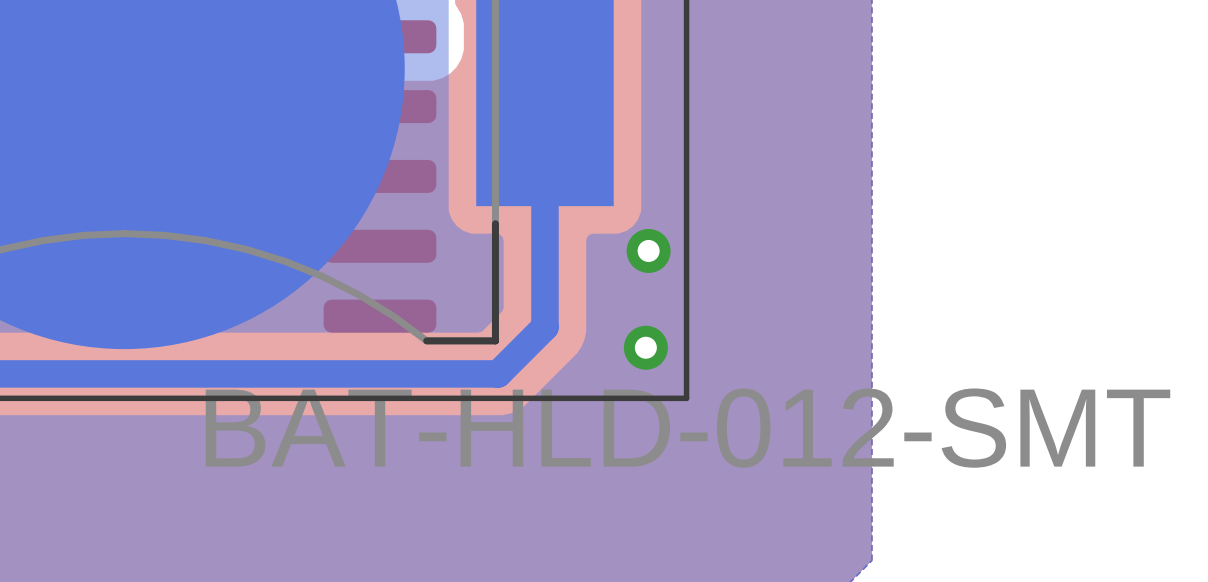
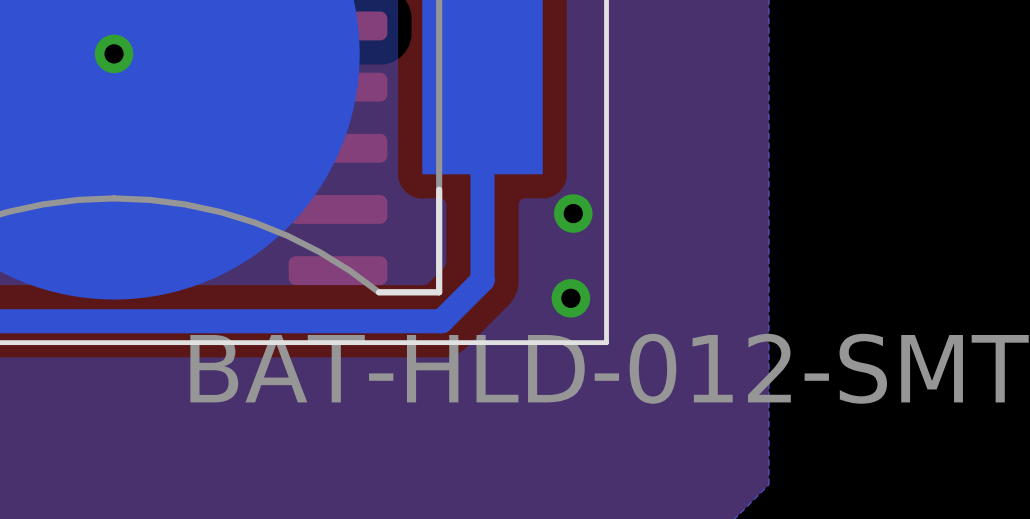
via: none -> (114, 53)

